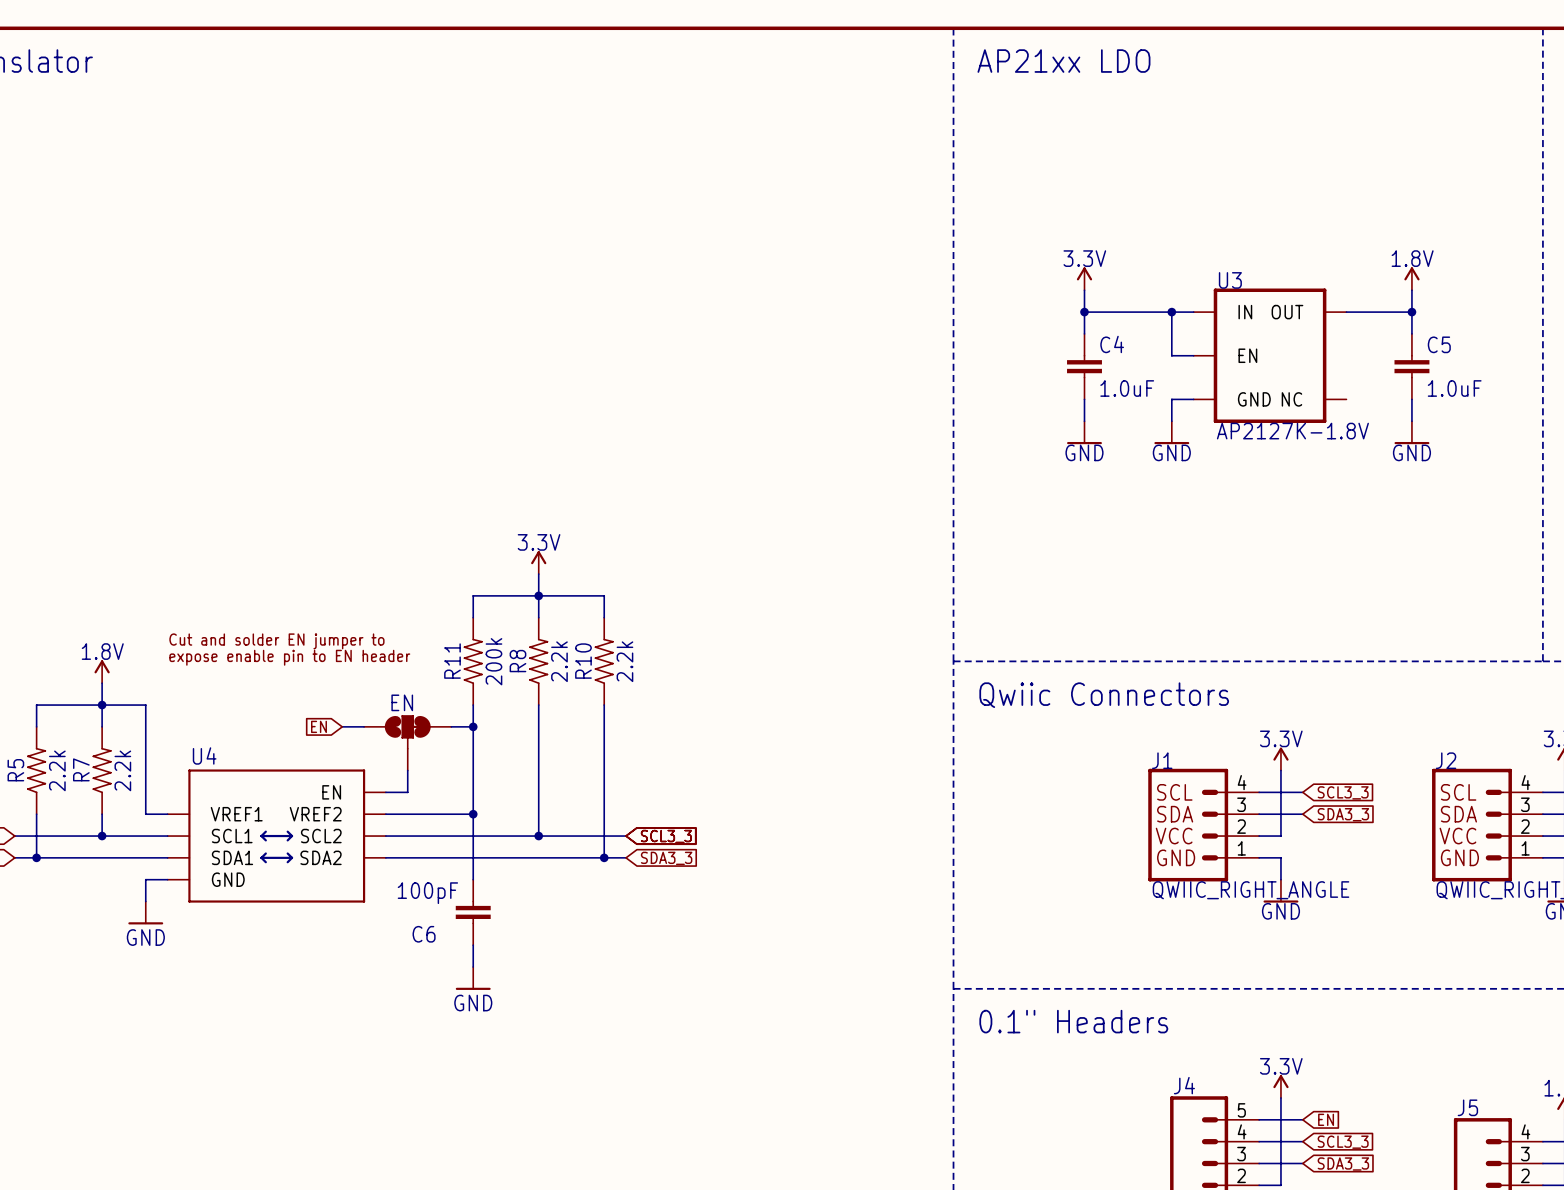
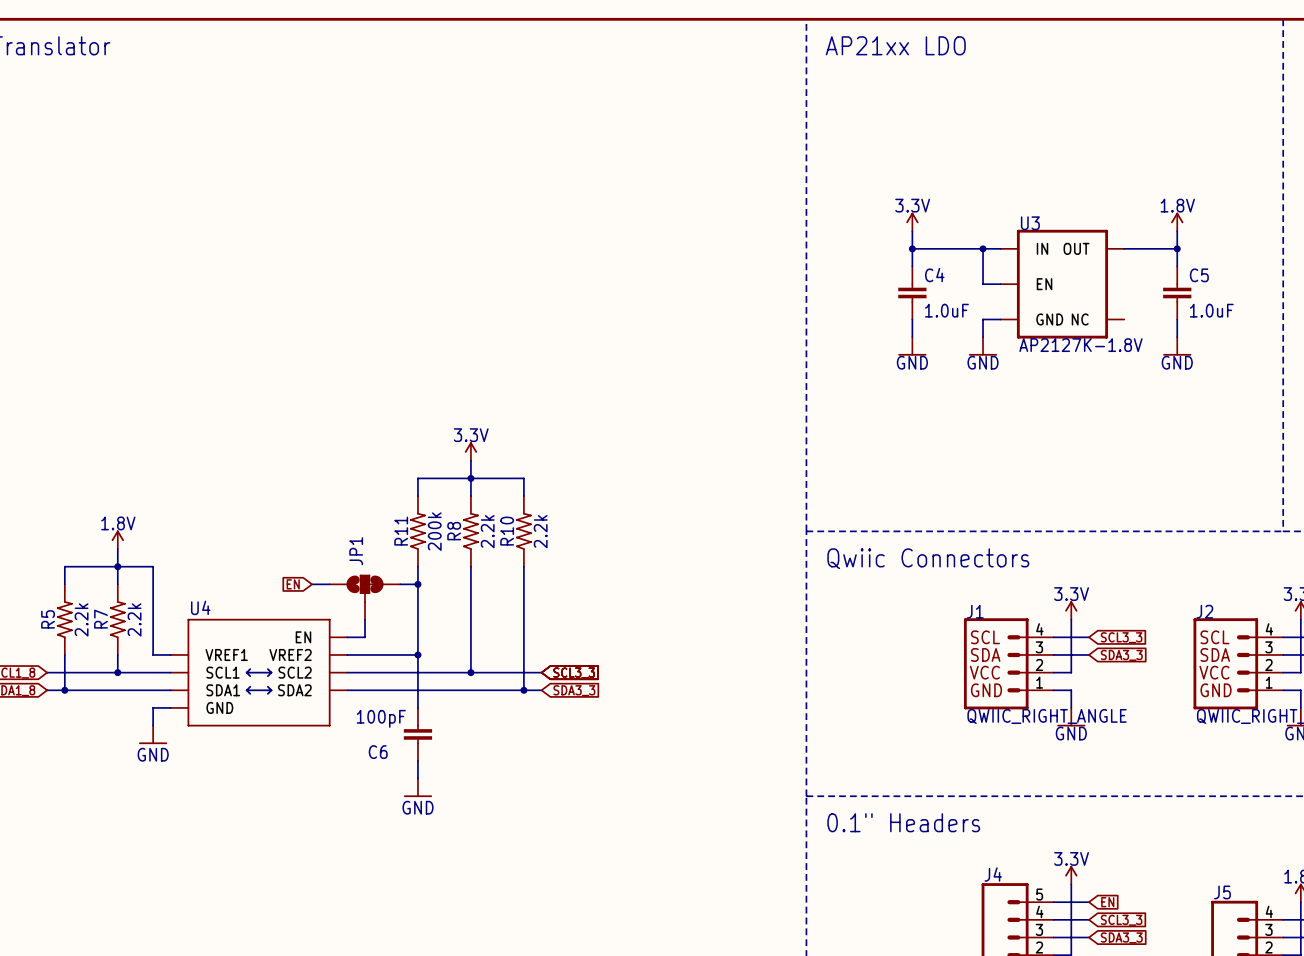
text: Cut and solder EN jumper to (276, 641) -> none
text: expose enable pin to EN header (289, 657) -> none
EN name: EN (402, 702) -> JP1 (356, 551)

